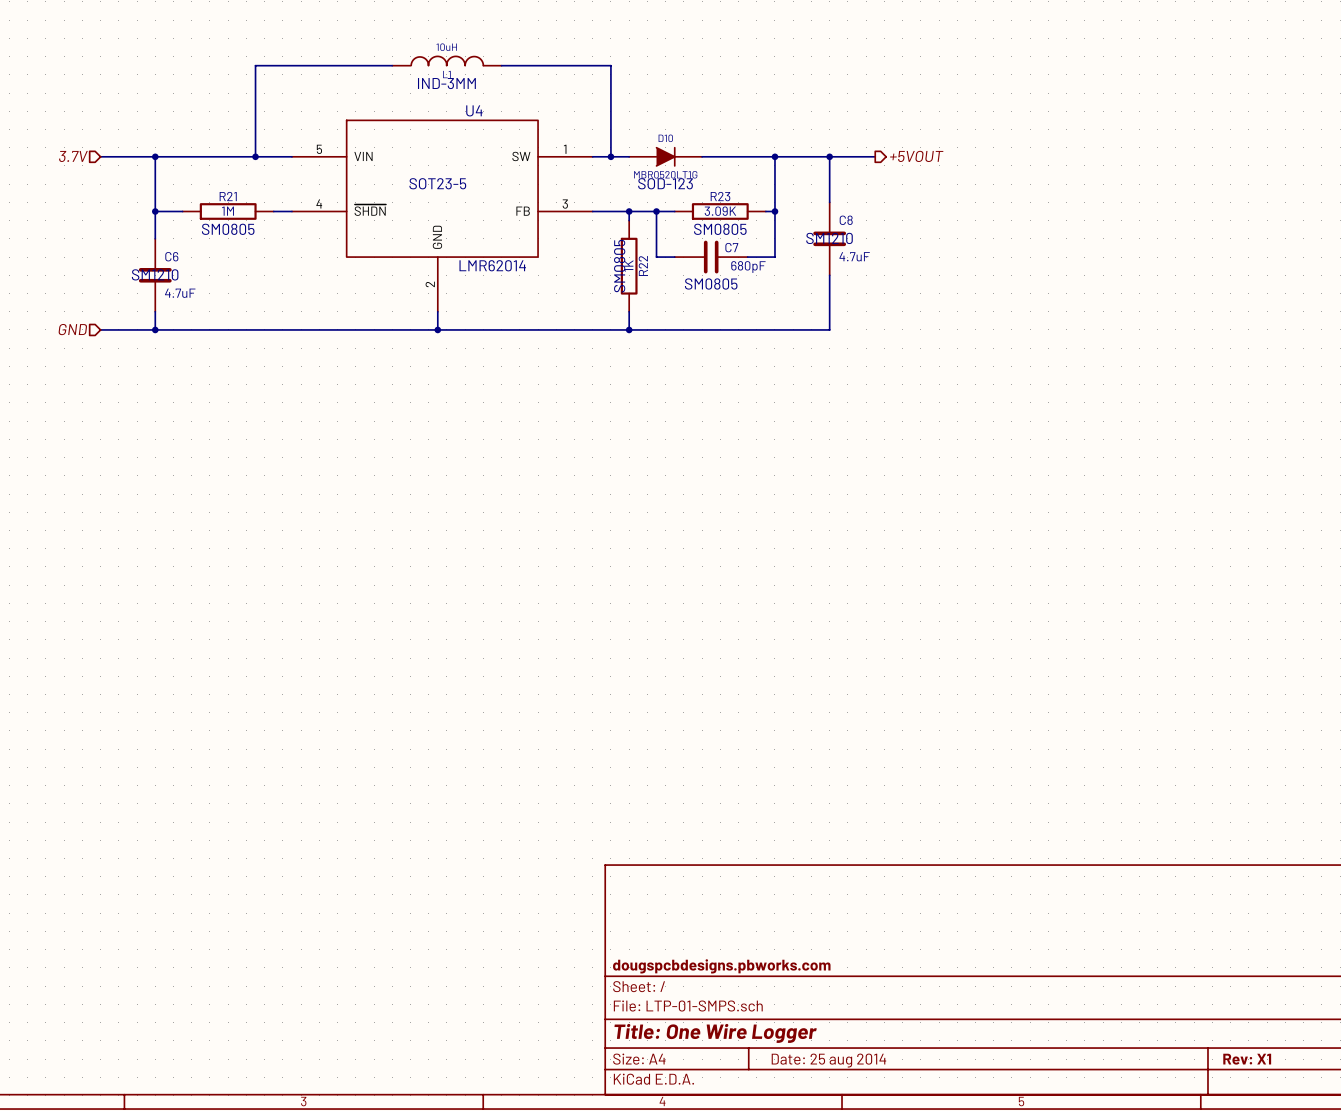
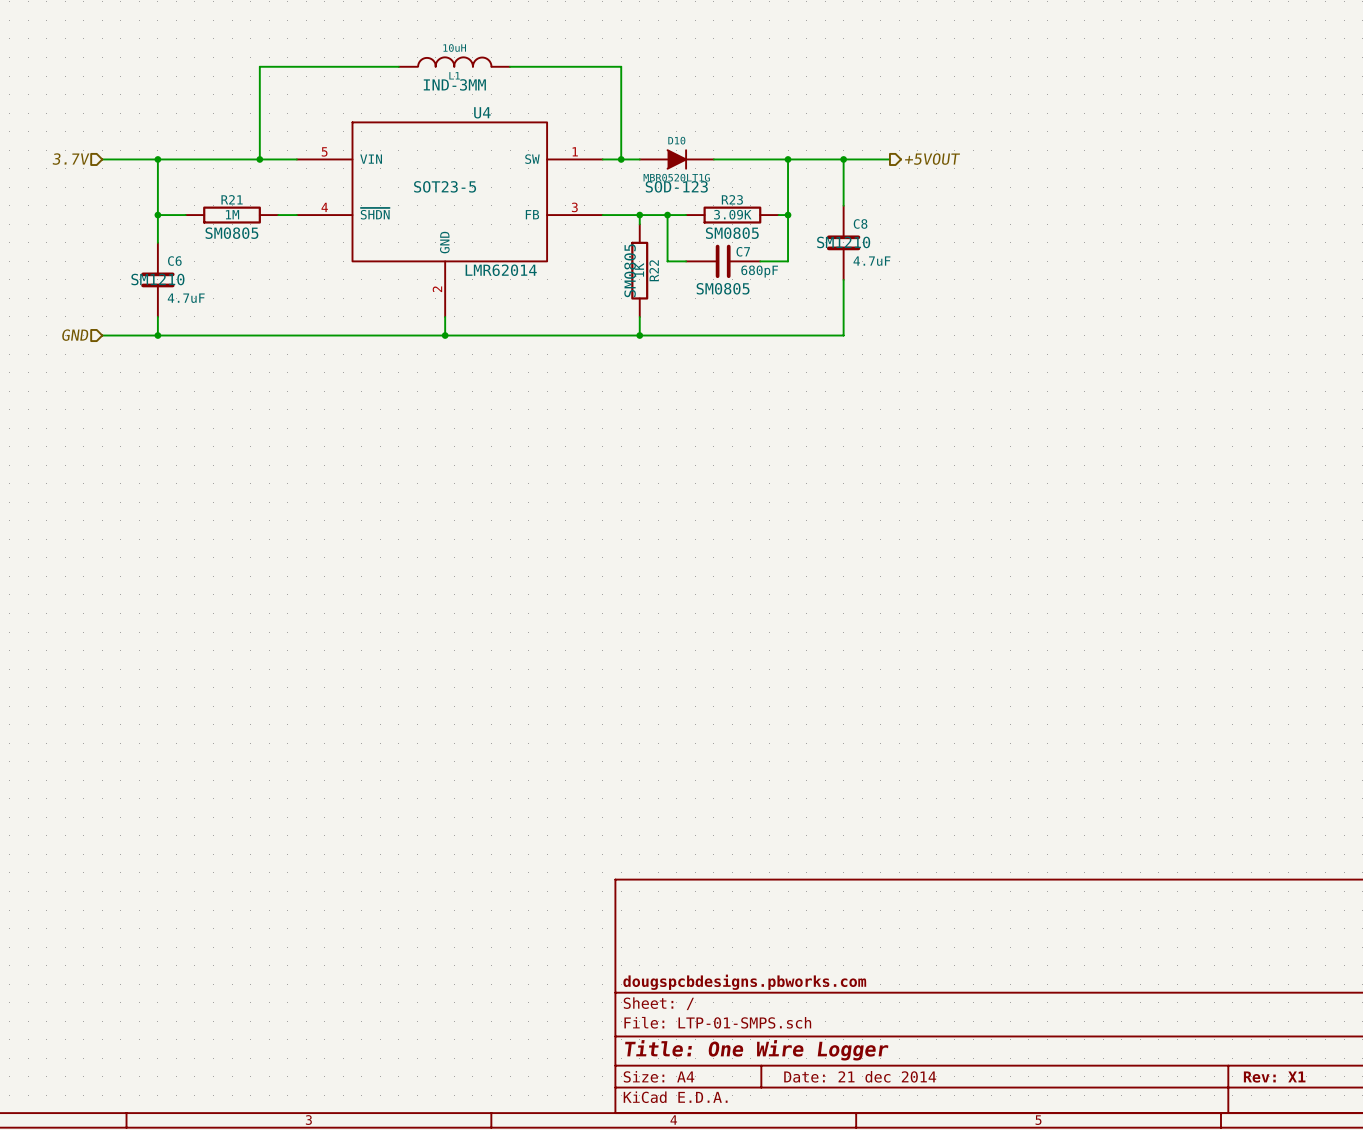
title block: Date: 25 aug 2014 (828, 1060) -> Date: 21 dec 2014 (860, 1076)

